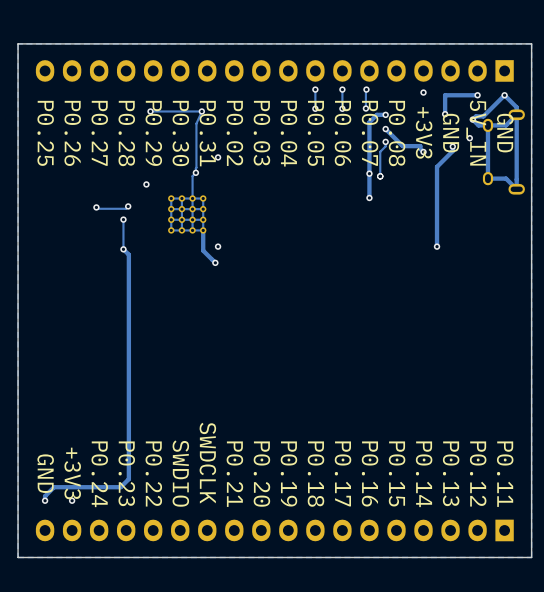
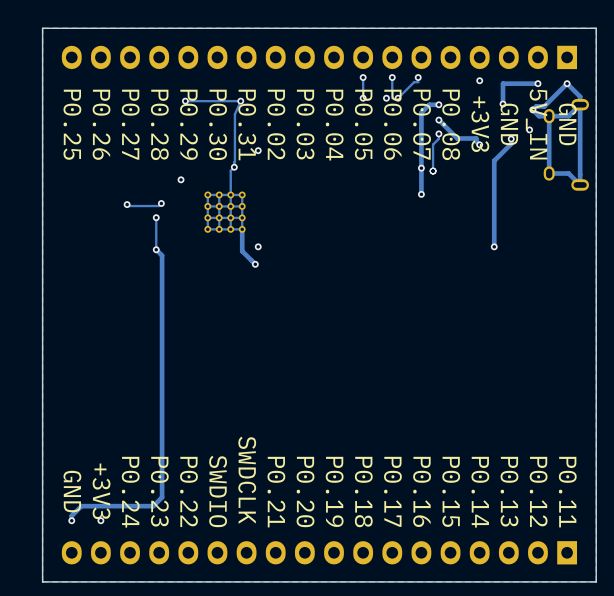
track: (366, 89) (365, 108) -> none
track: none -> (418, 82) (414, 82) (398, 98)
via: none -> (386, 98)
via: (342, 108) -> none
via: none -> (398, 98)
via: (365, 108) -> none

